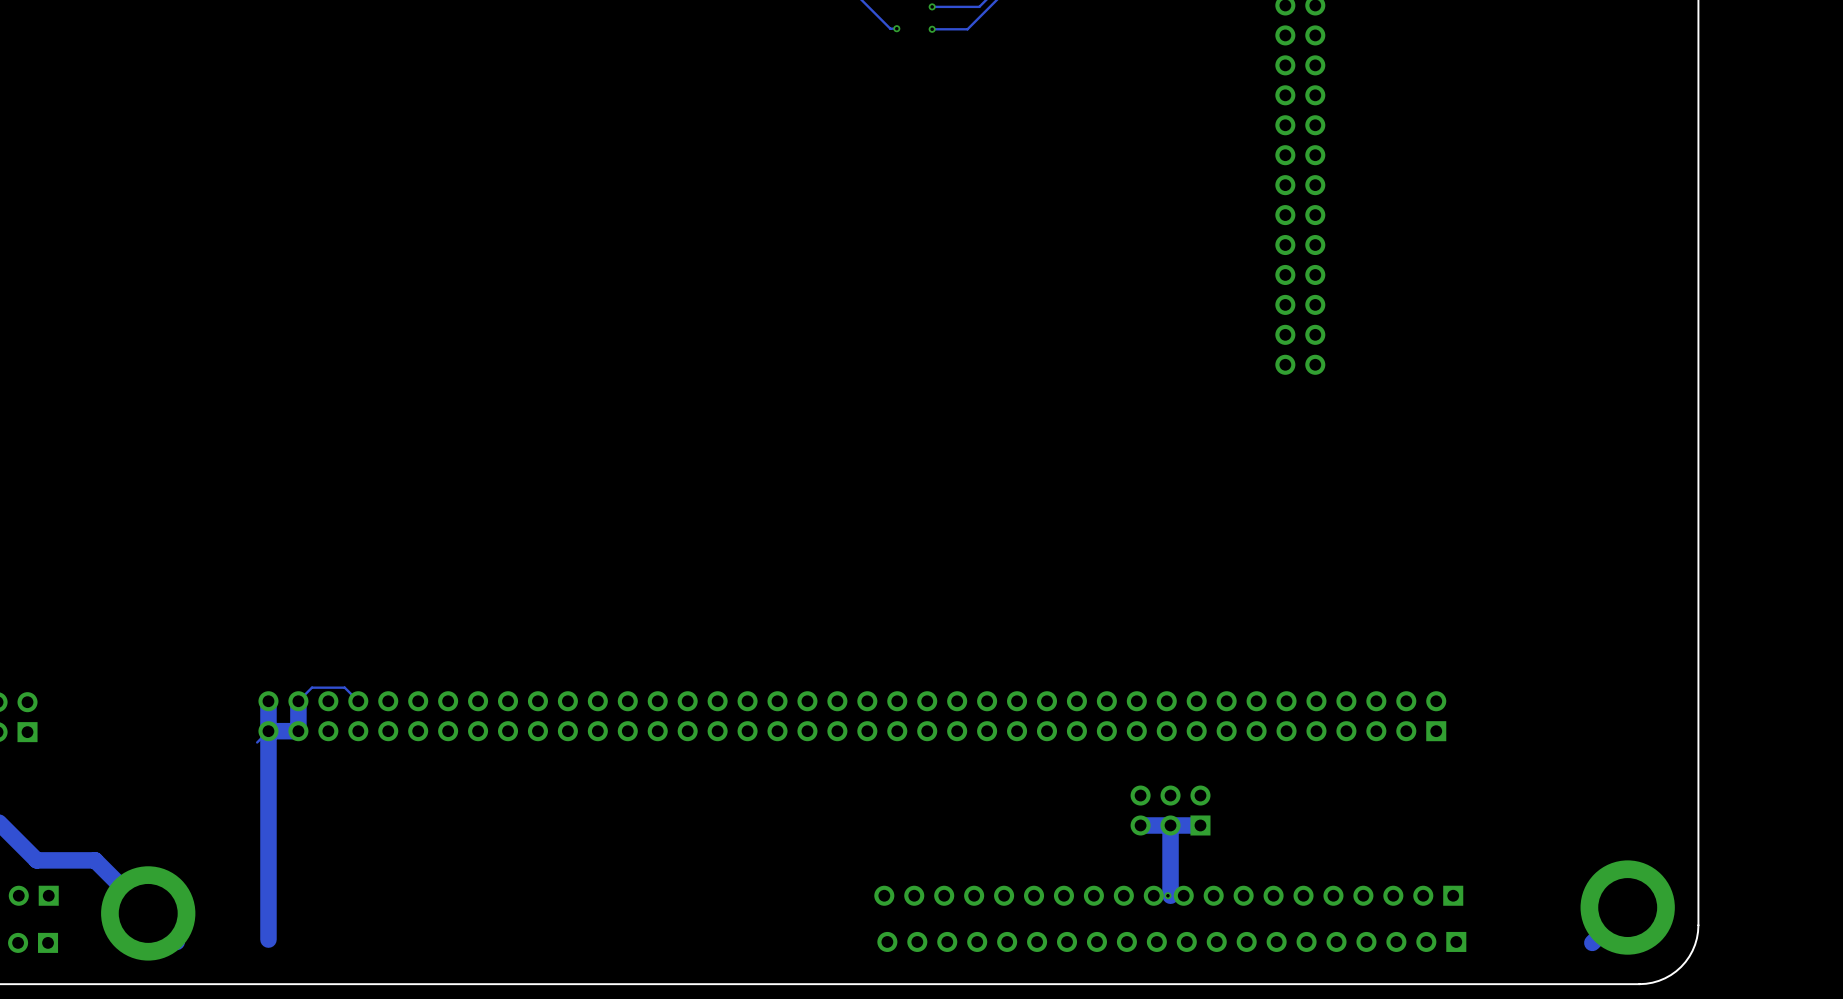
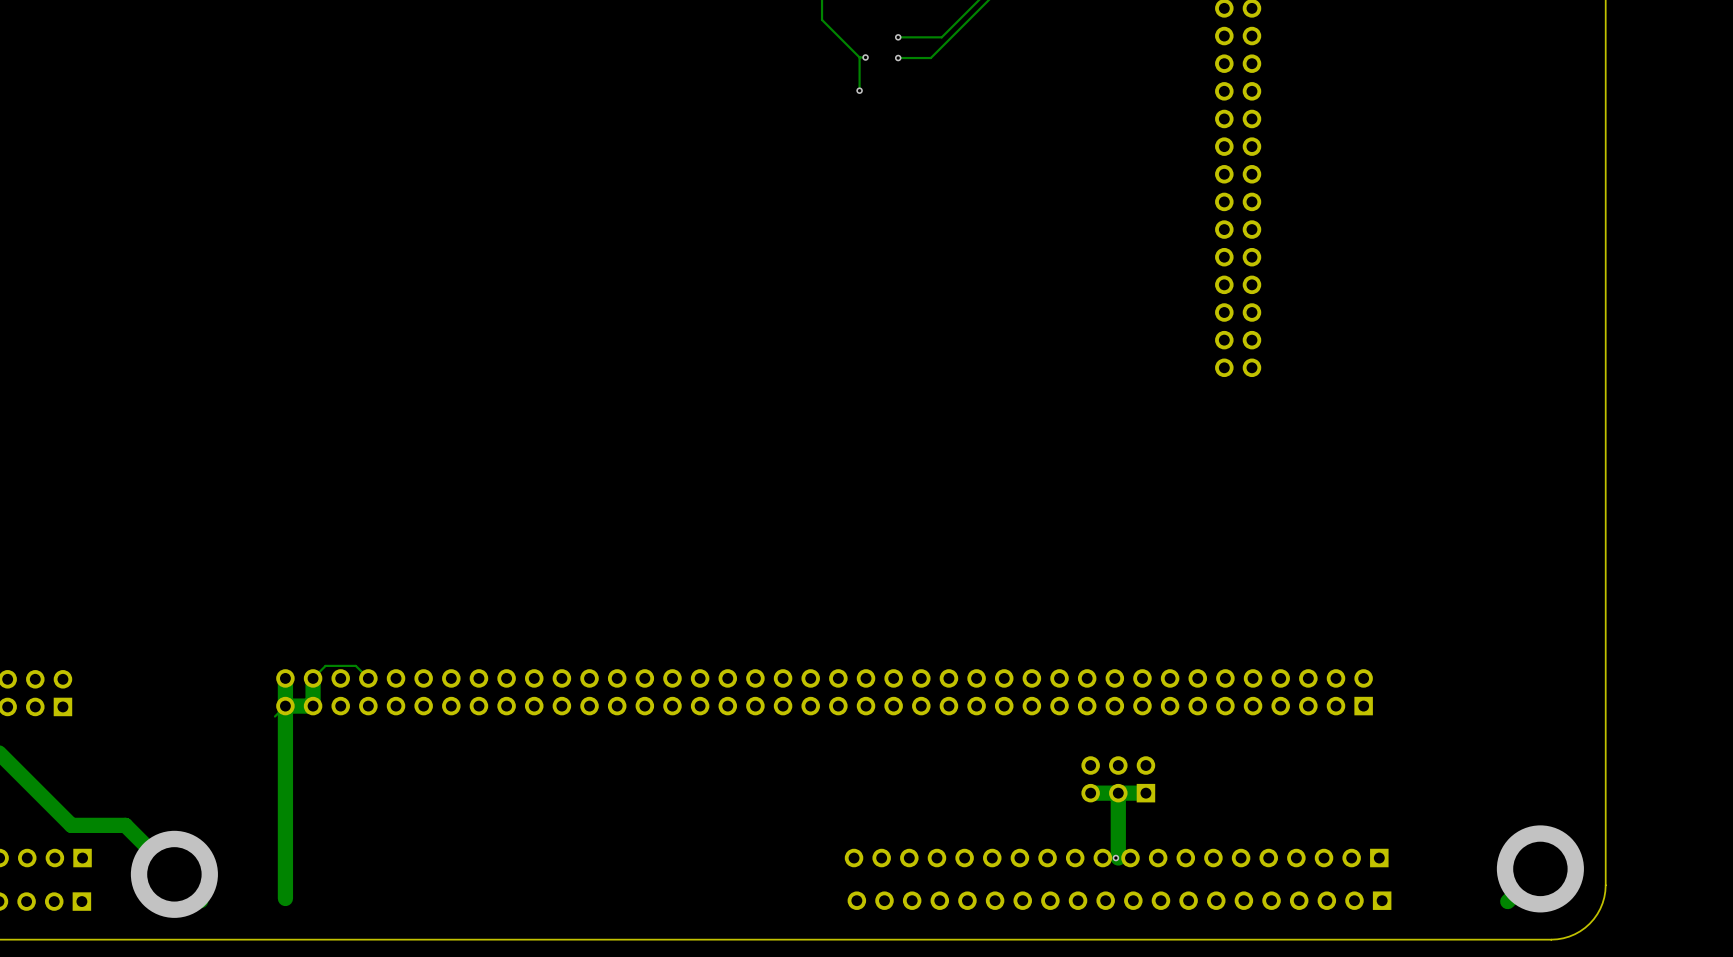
track: none -> (859, 57) (859, 90)
via: none -> (859, 90)

